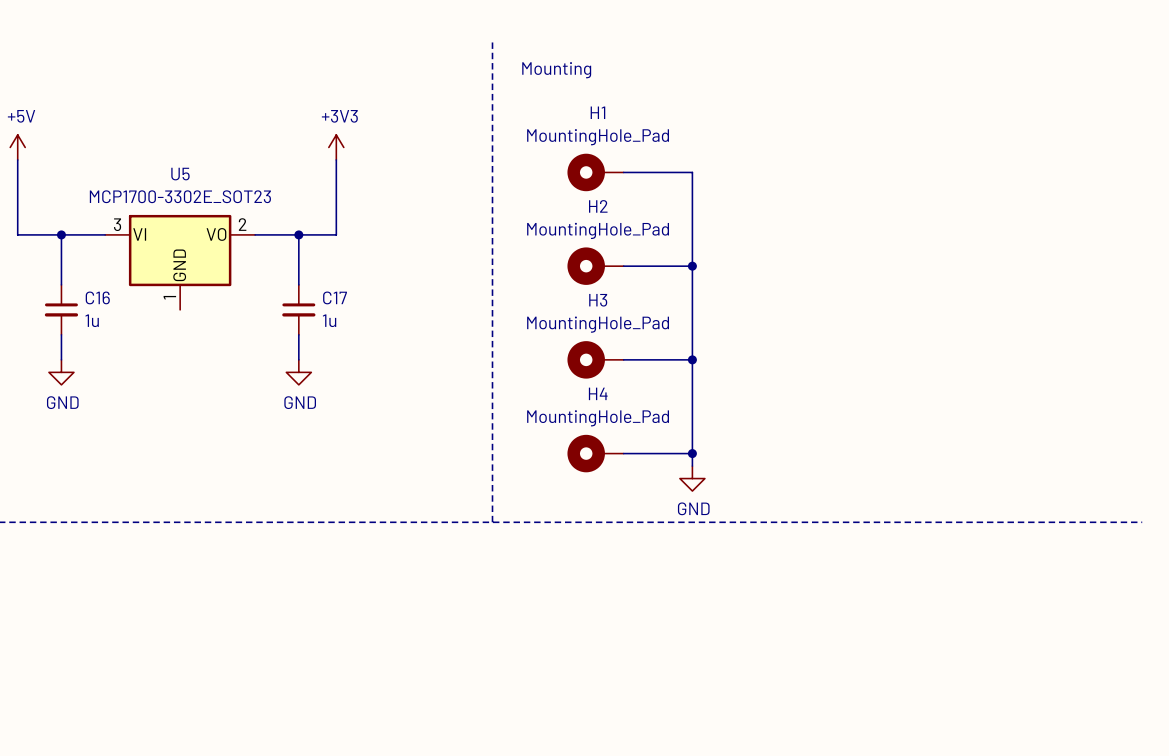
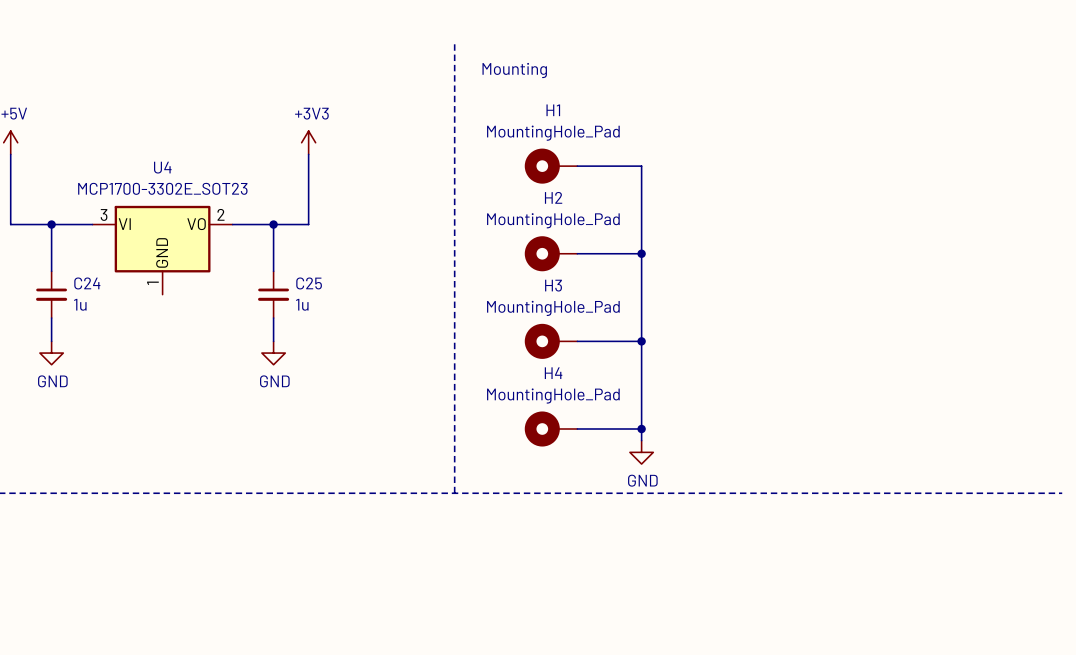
U5 name: U5 (180, 174) -> U4 (162, 167)
C16 name: C16 (97, 297) -> C24 (87, 283)
C17 name: C17 (335, 297) -> C25 (309, 283)

